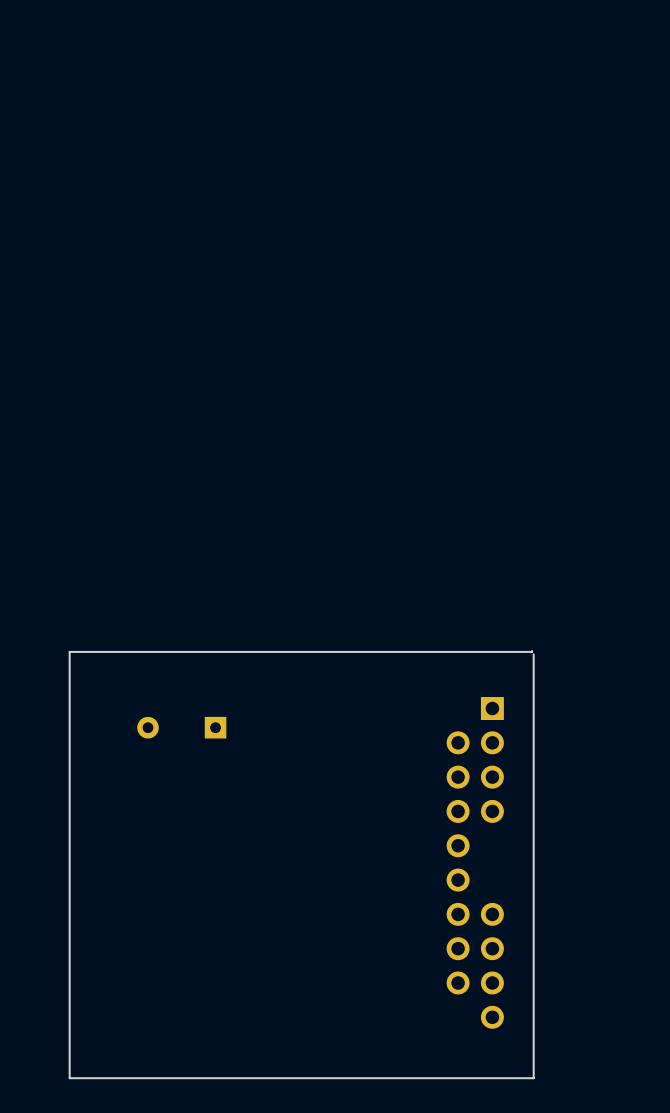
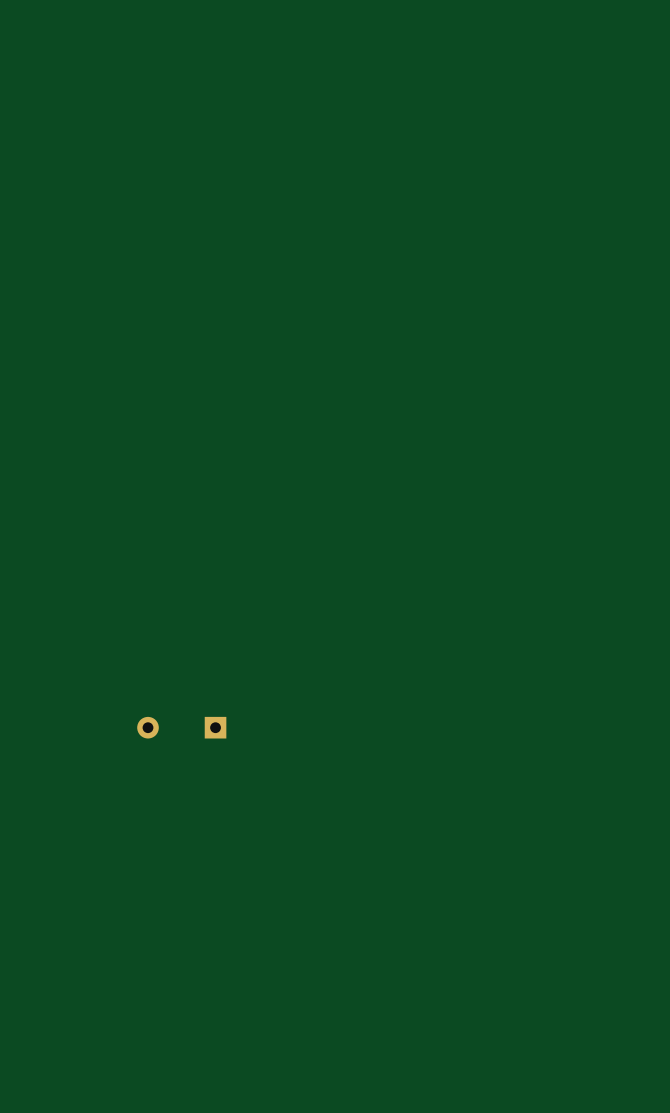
board edge: (531, 651) (69, 651) (69, 1078) (533, 1078) (533, 654) -> none
part: (475, 862) -> none

